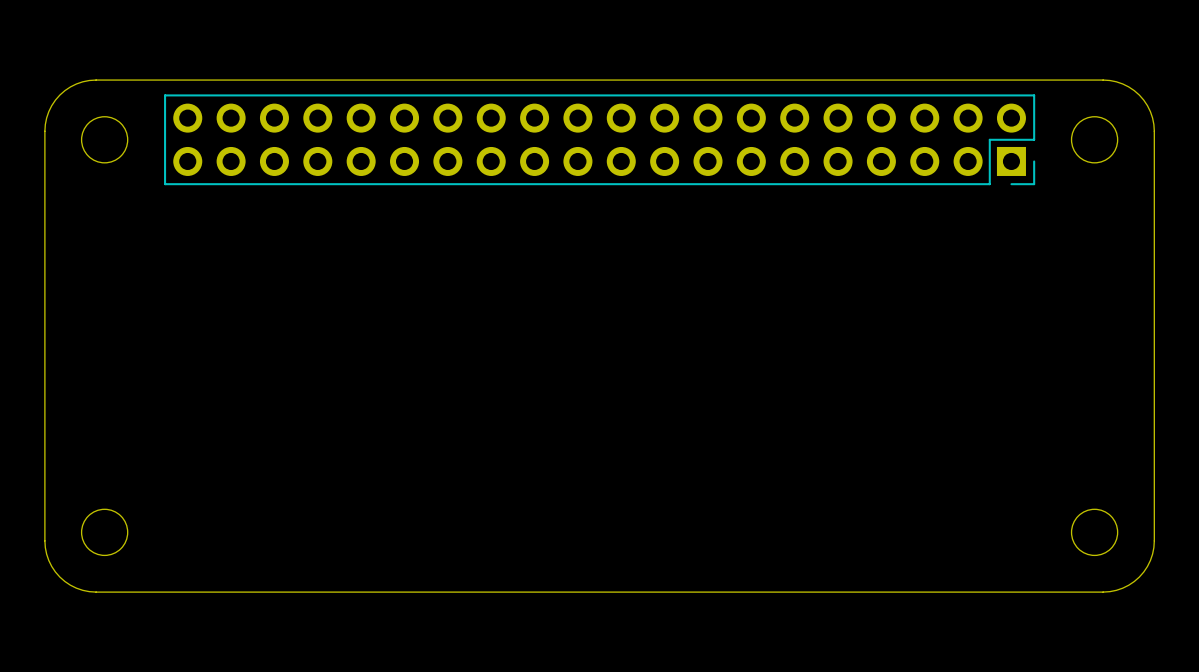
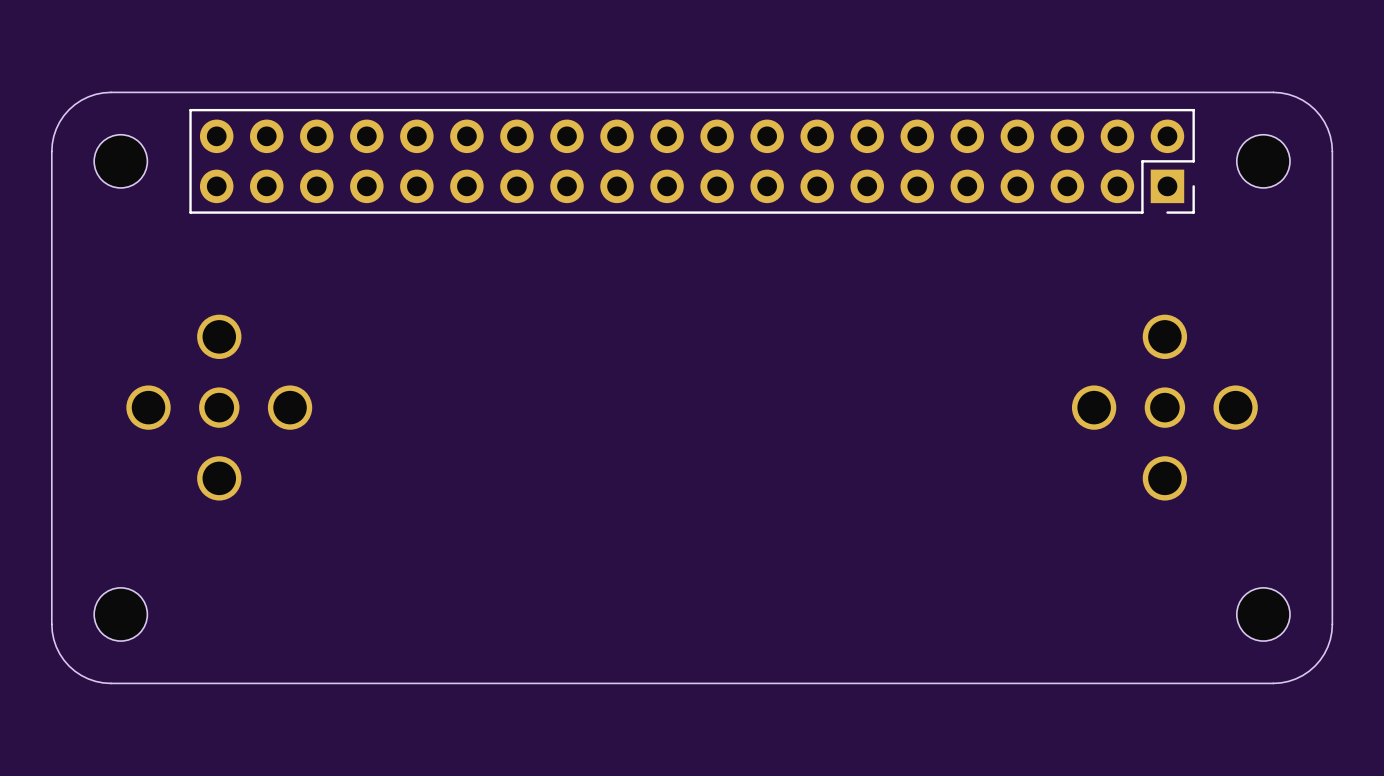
part: none -> (219, 407)
part: none -> (1164, 407)

